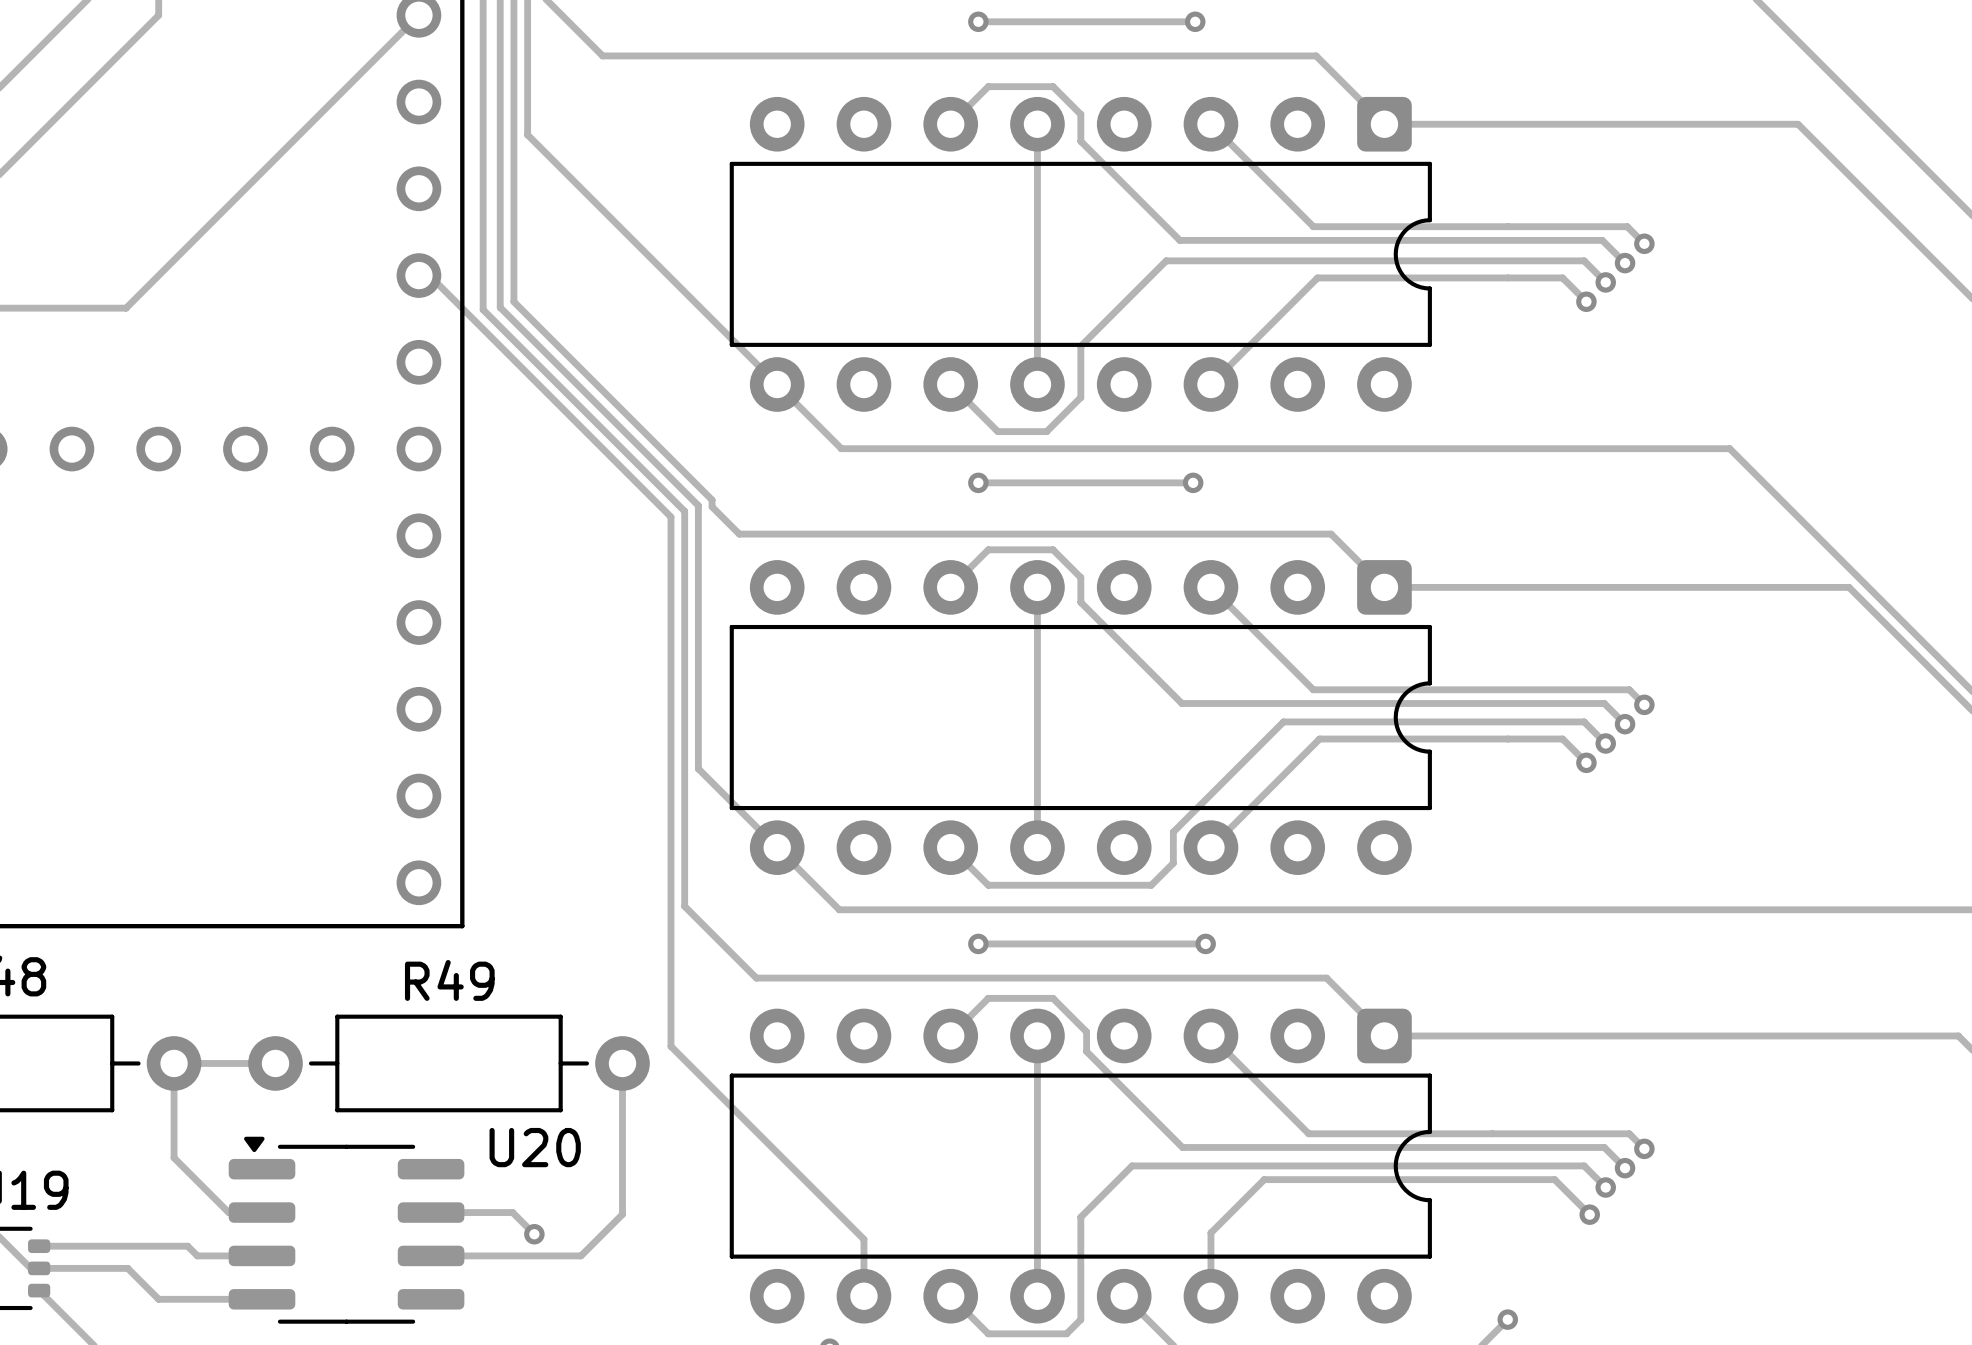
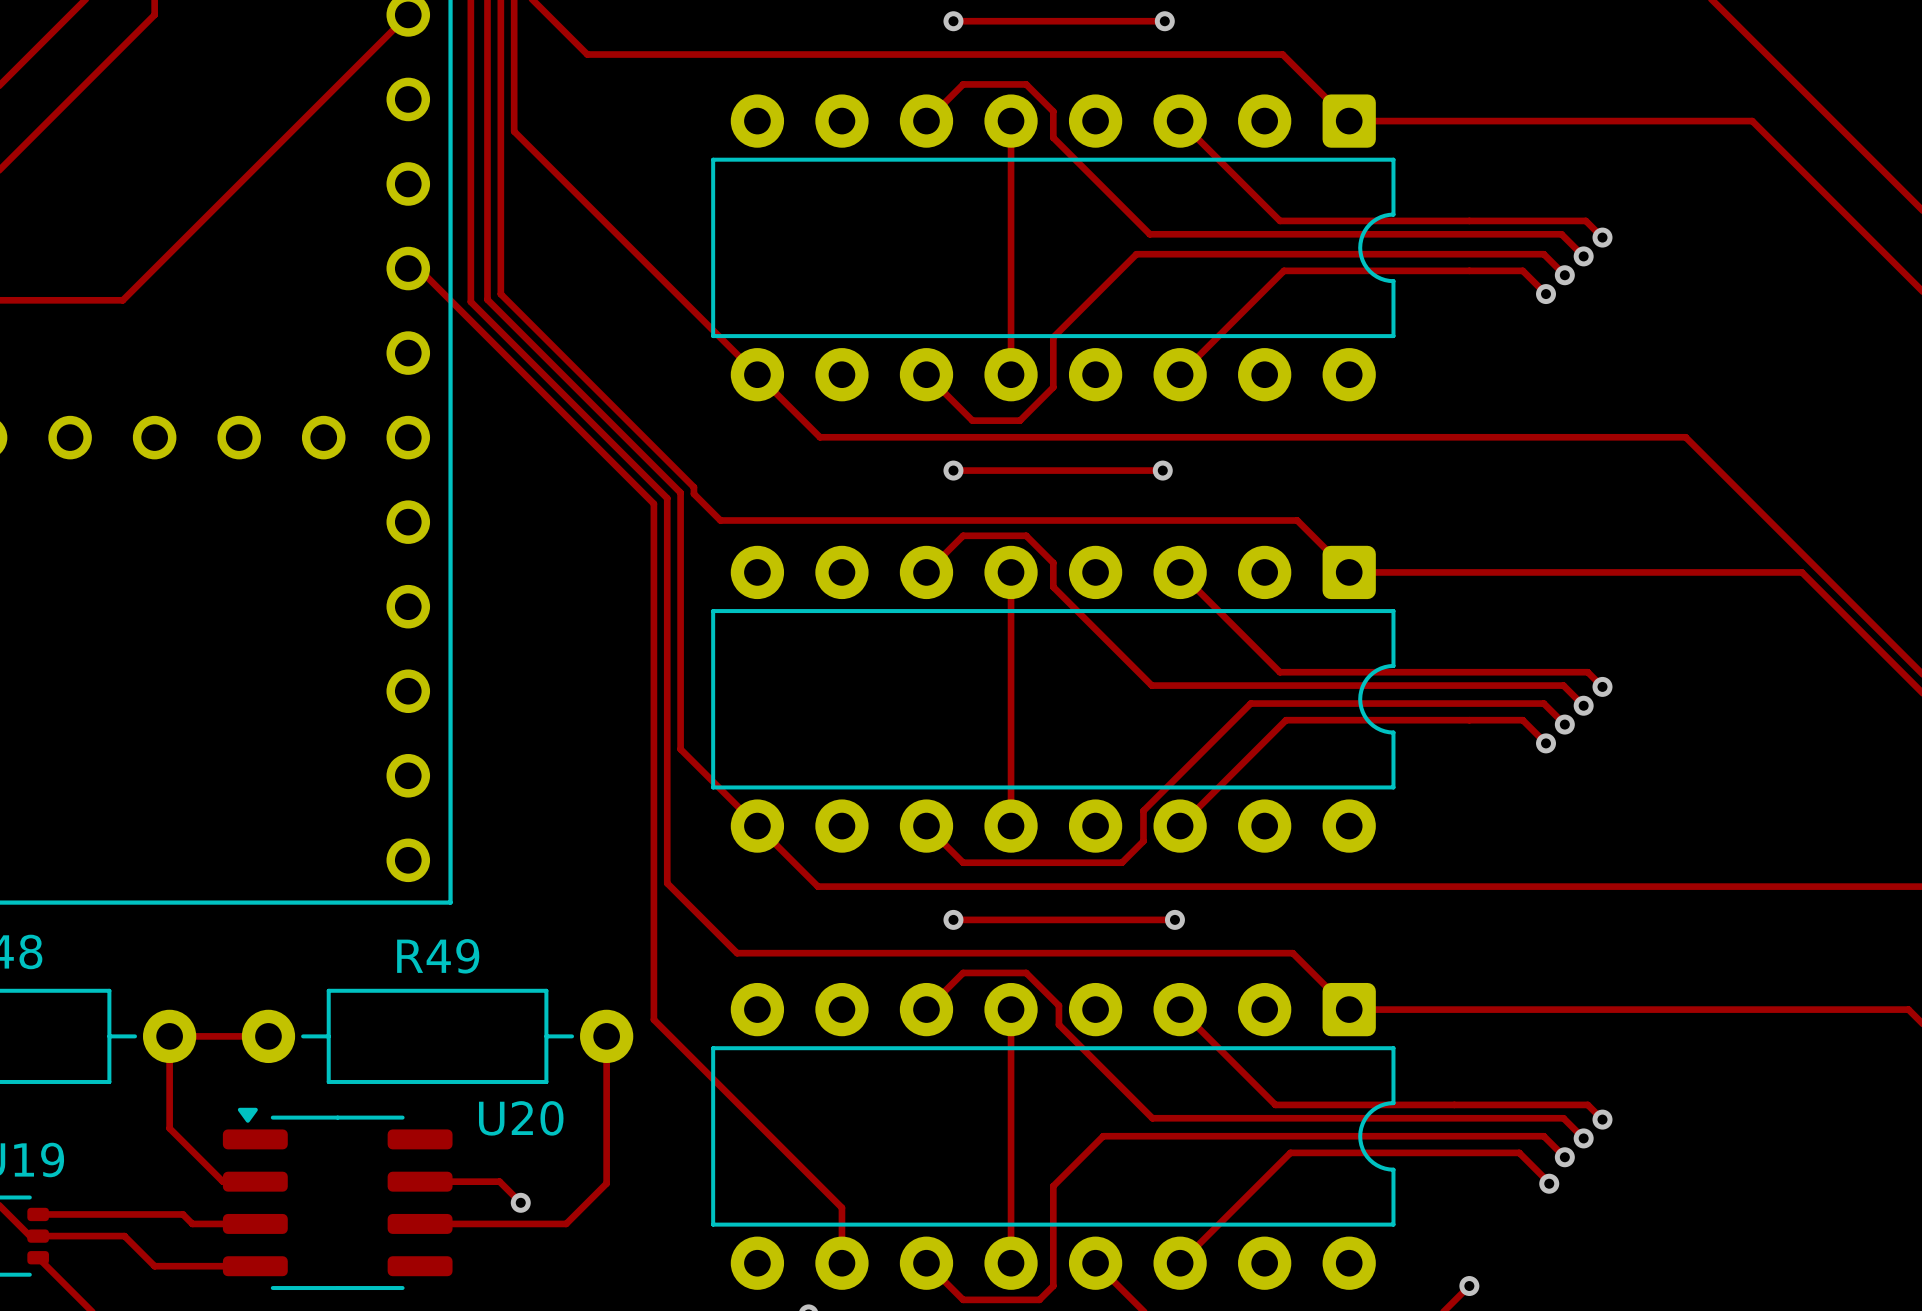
track: (1589, 1214) (1554, 1179) (1264, 1179) (1210, 1232) (1210, 1296) -> (1549, 1186) (1549, 1182) (1519, 1152) (1290, 1152) (1180, 1263)

